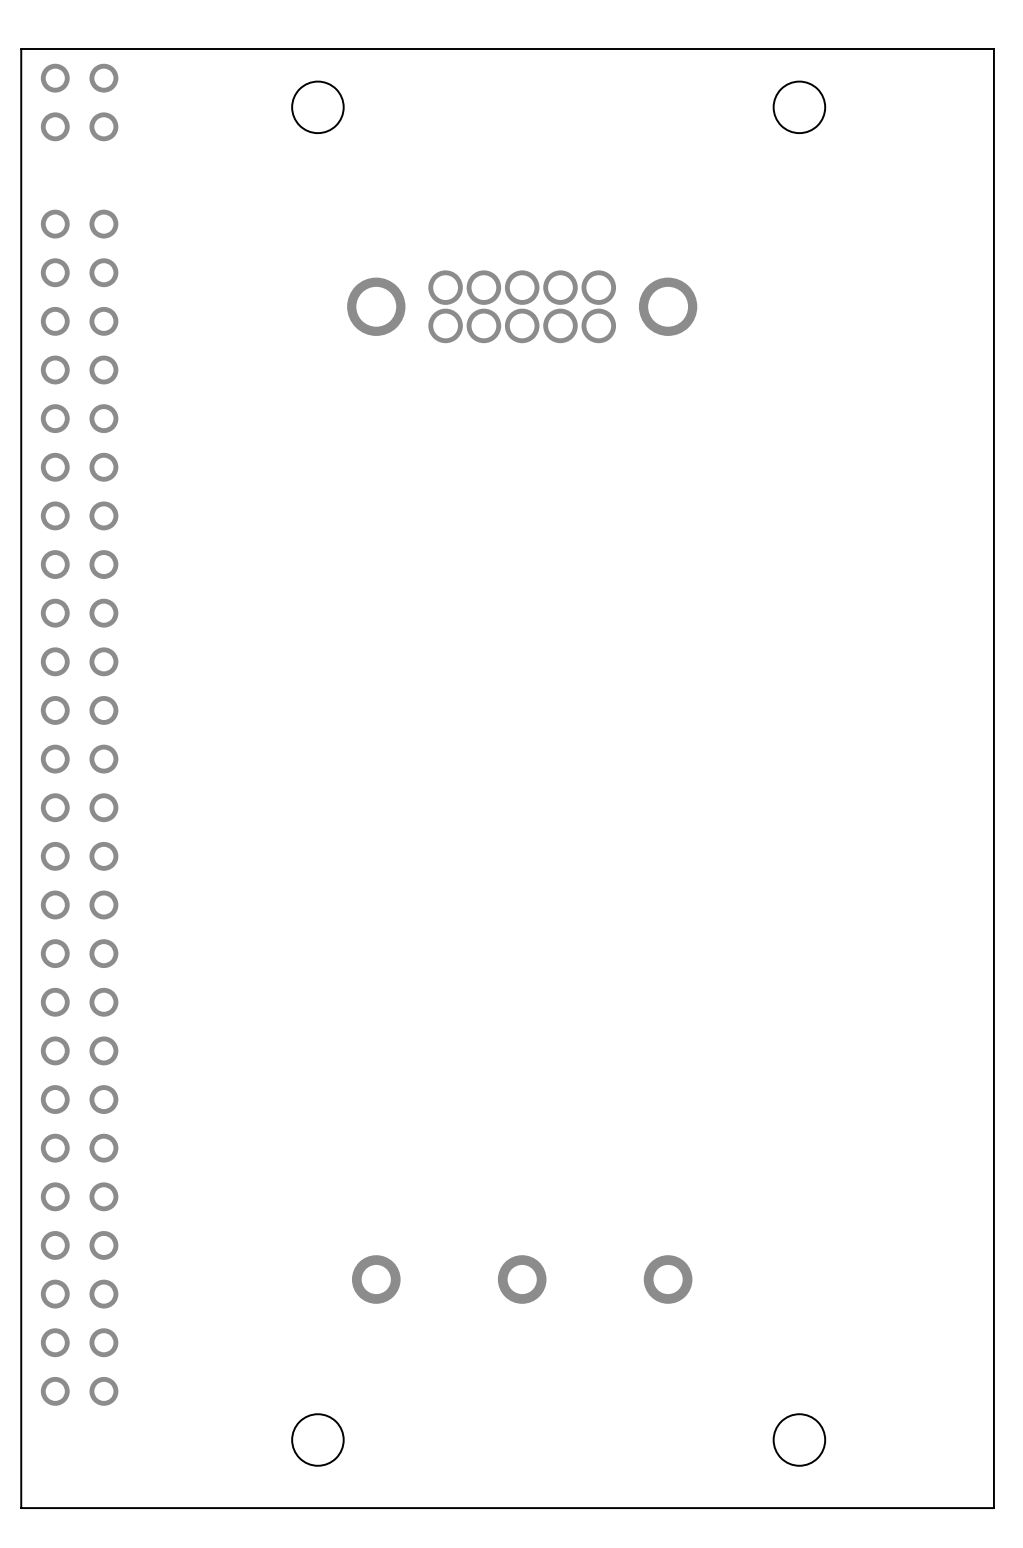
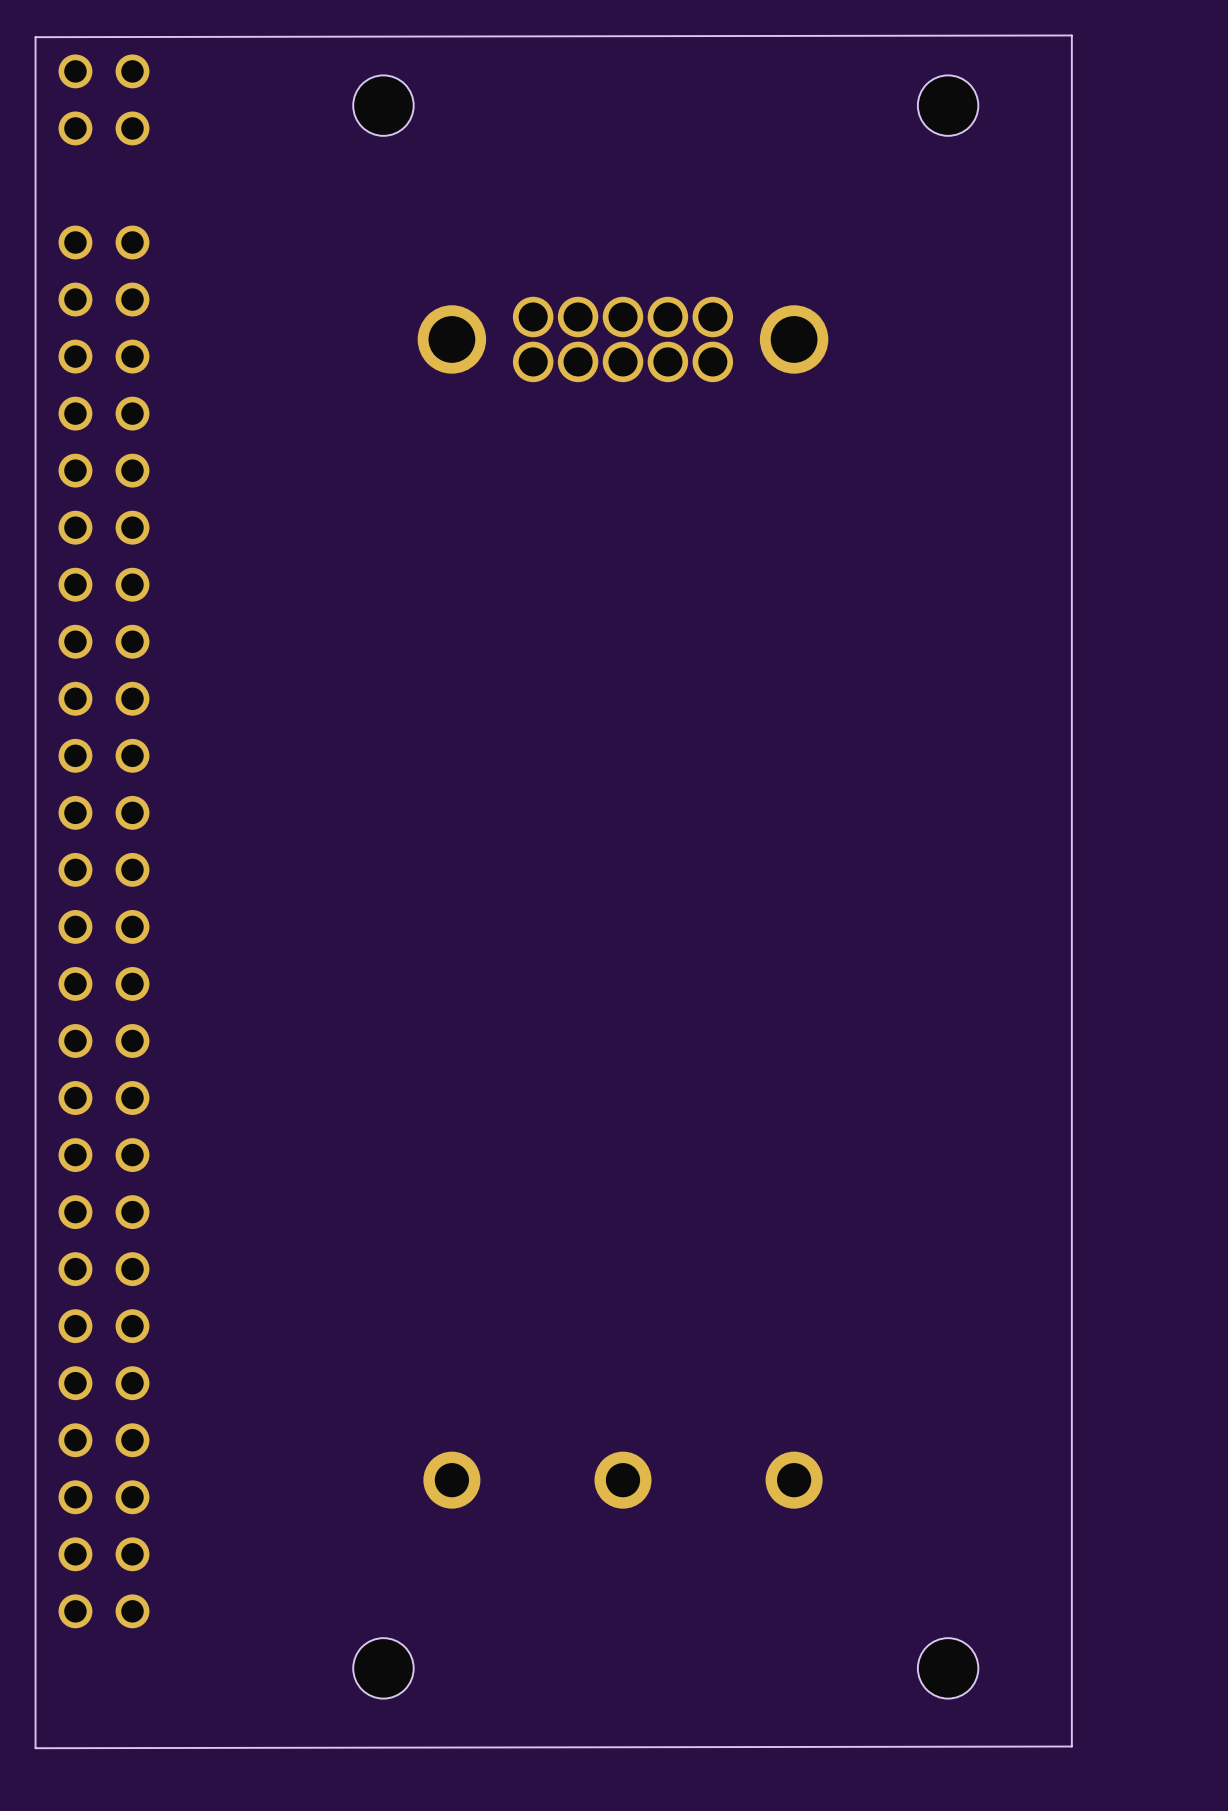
board edge: (21, 49) (993, 49) (993, 1508) (21, 1508) -> (35, 37) (1071, 35) (1071, 1746) (35, 1748)

